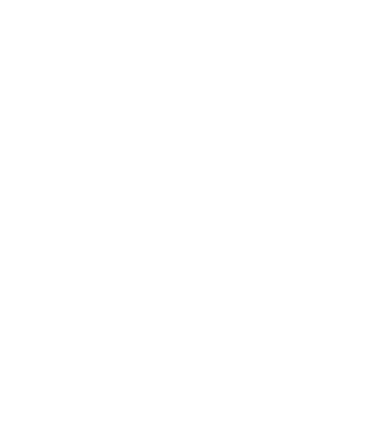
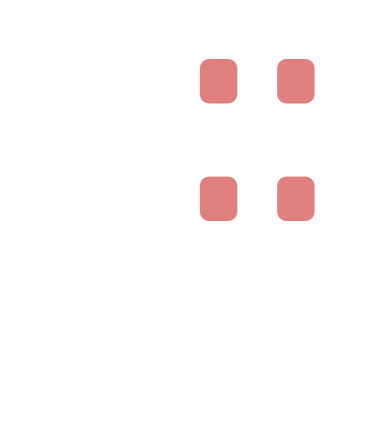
part: none -> (257, 81)
part: none -> (257, 198)

